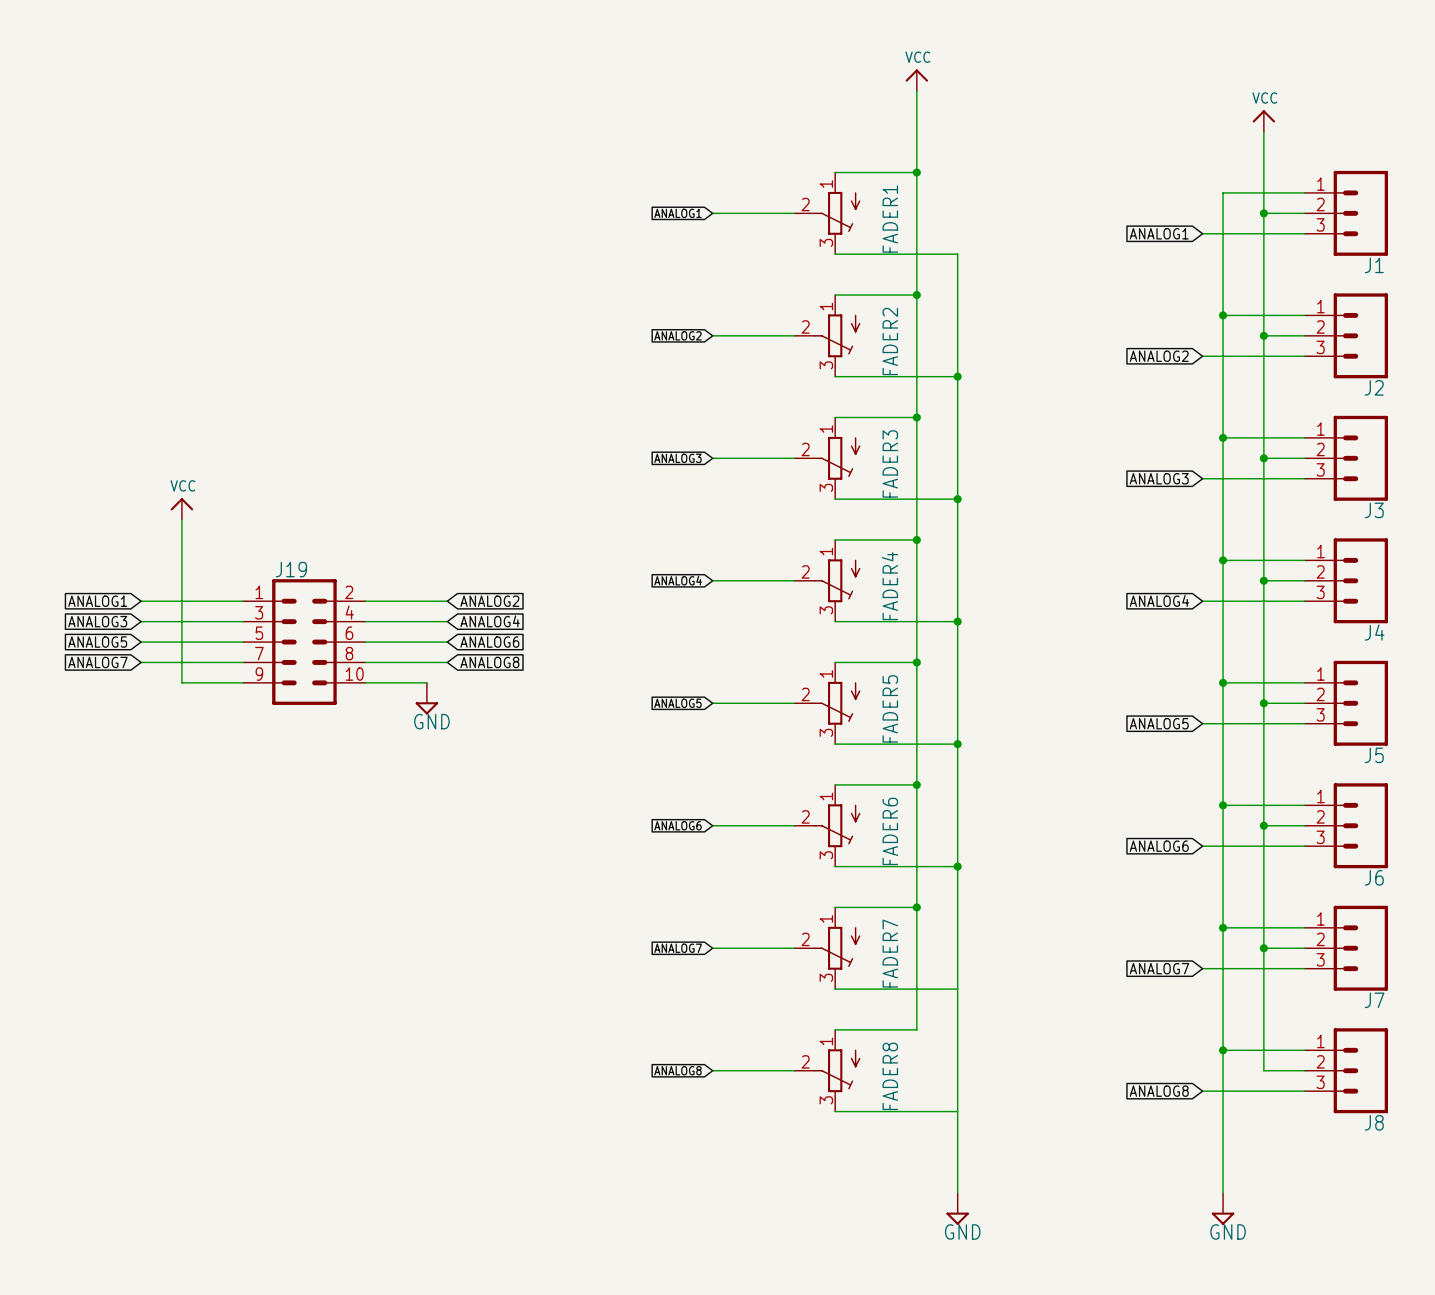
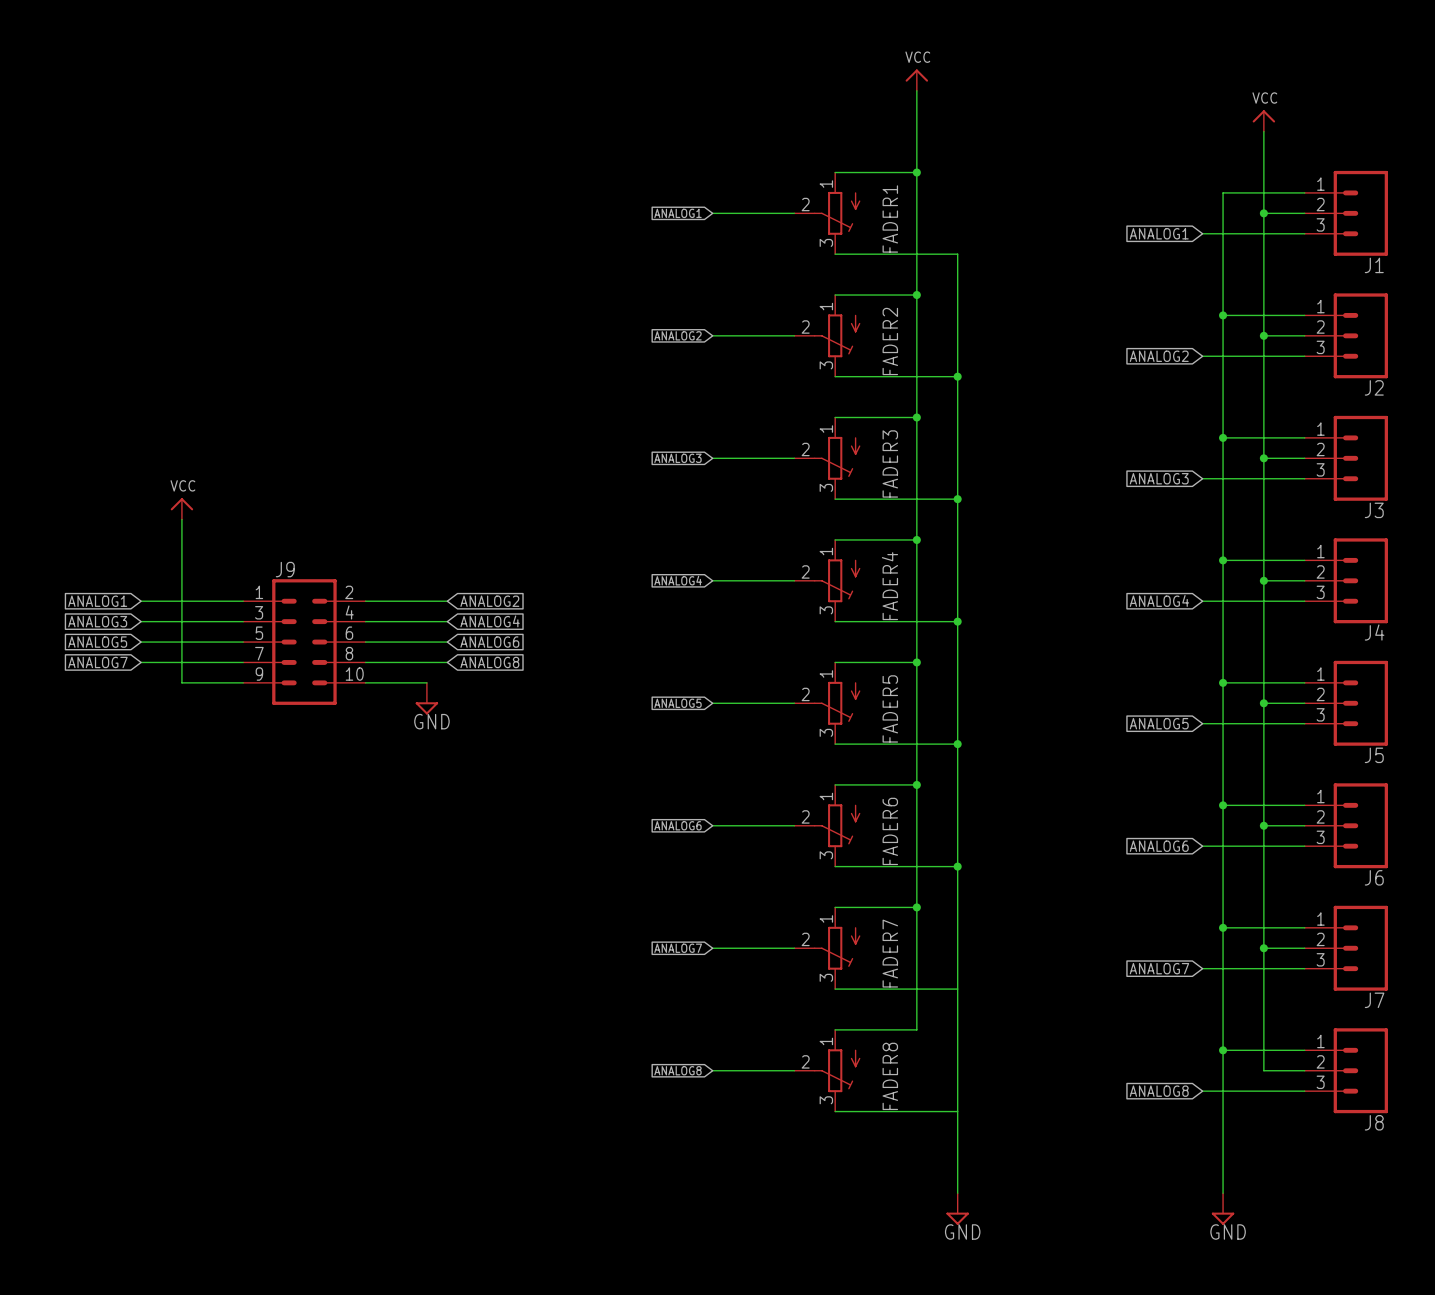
J19 name: J19 (291, 569) -> J9 (285, 569)

